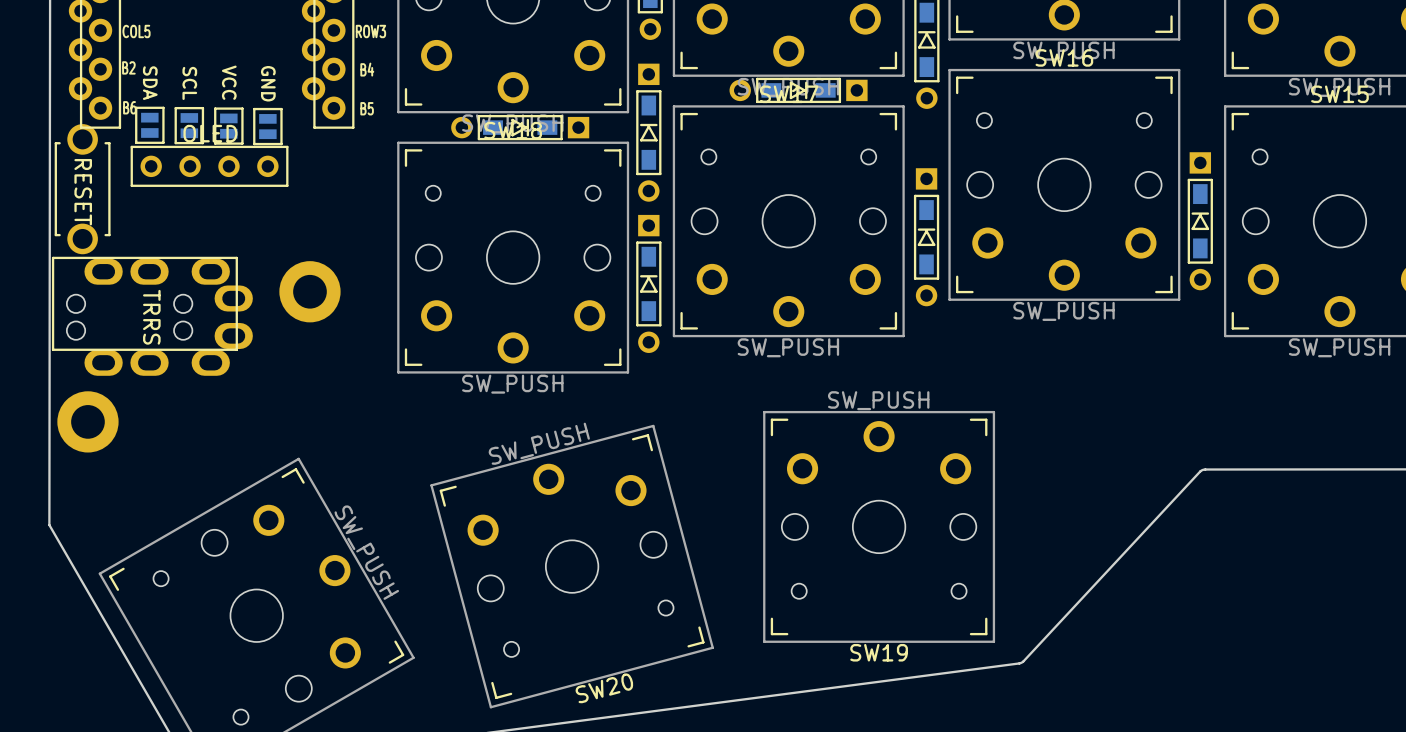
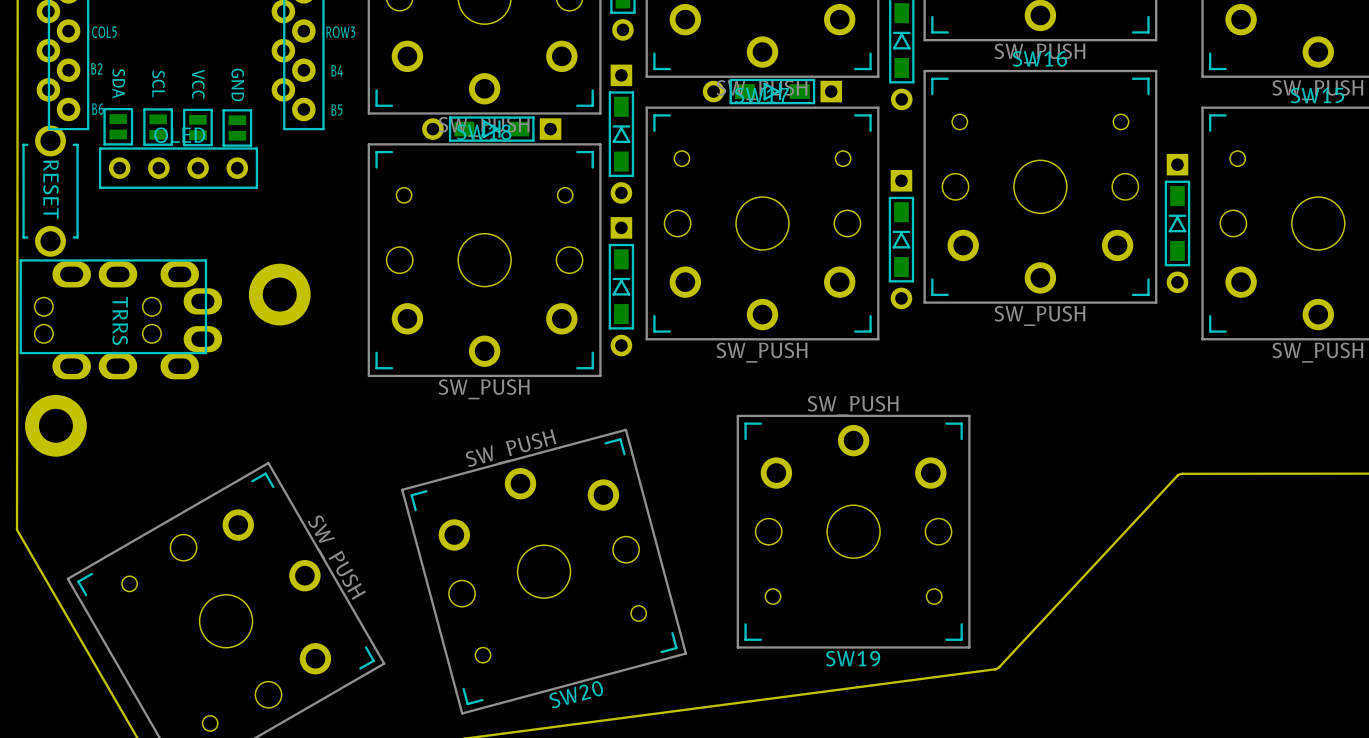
part rotation: 0° (82, 189) -> 180° (50, 191)

